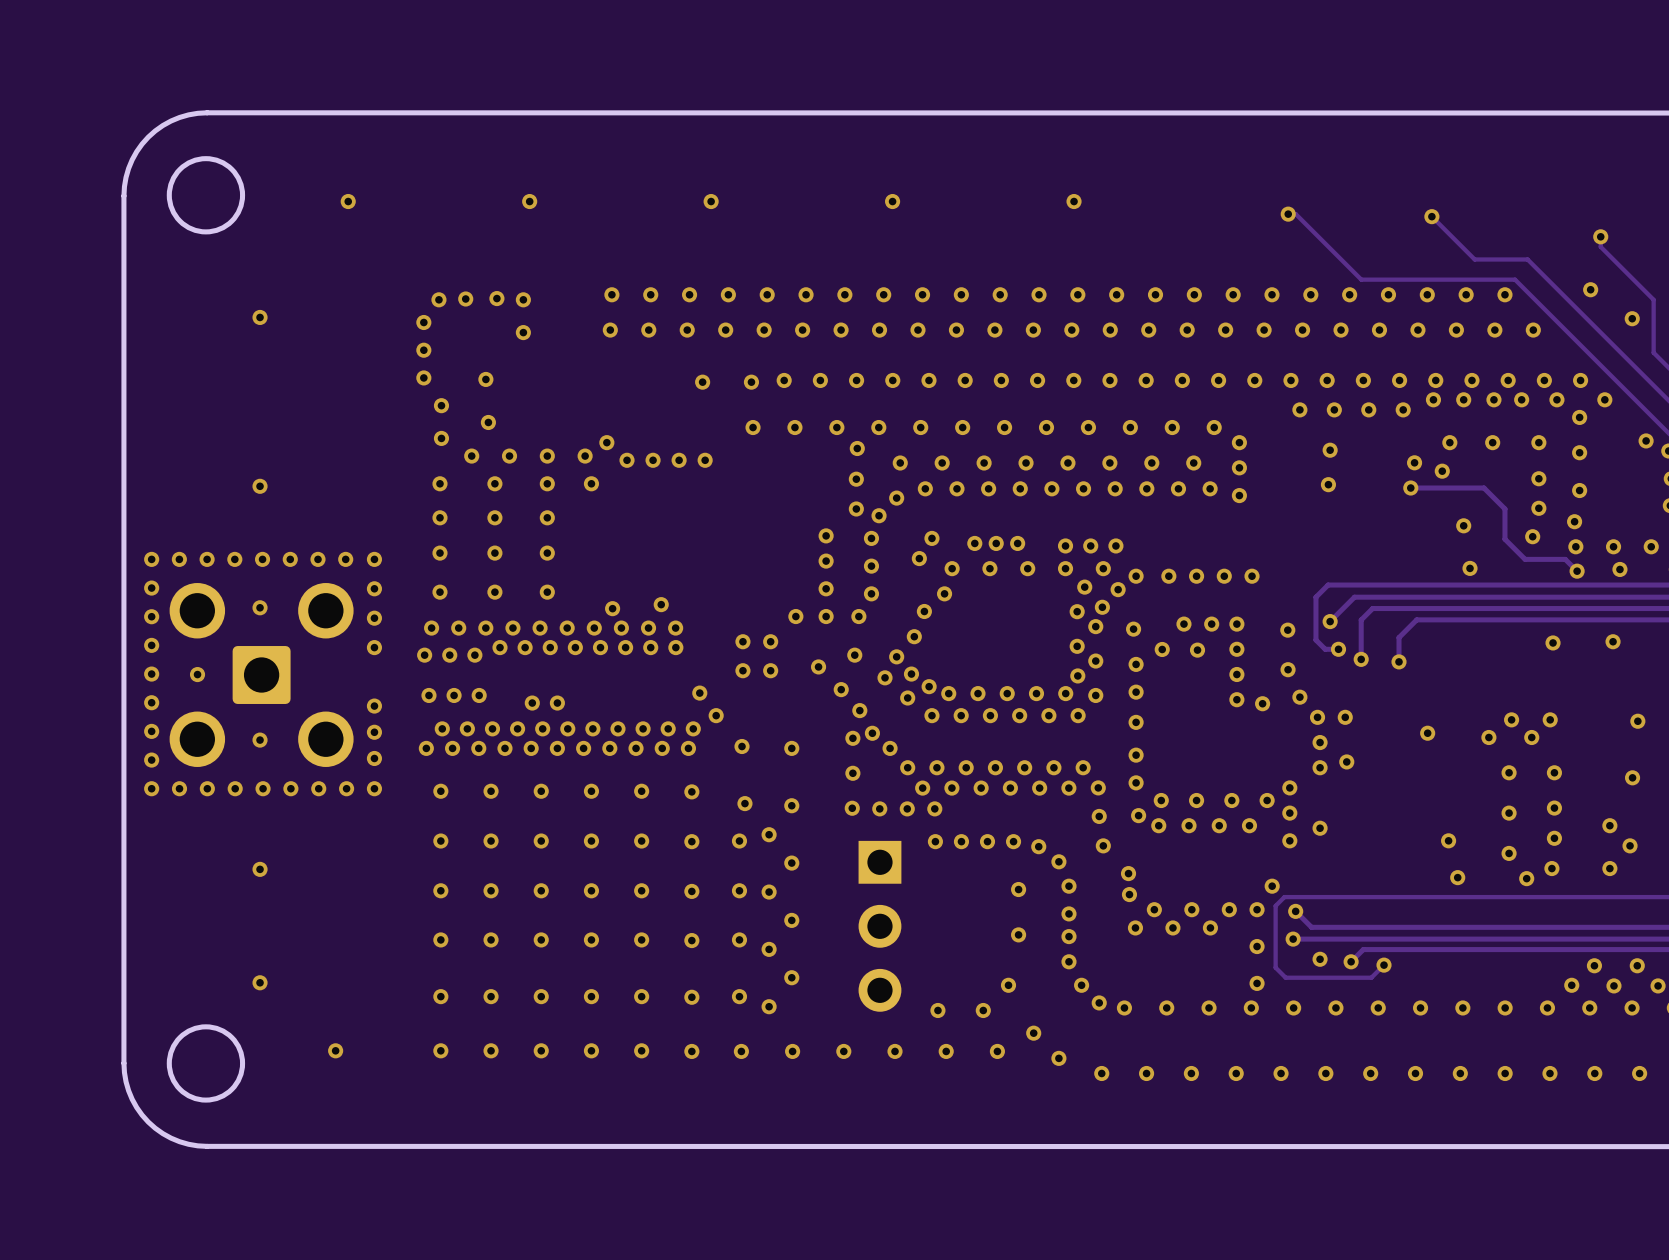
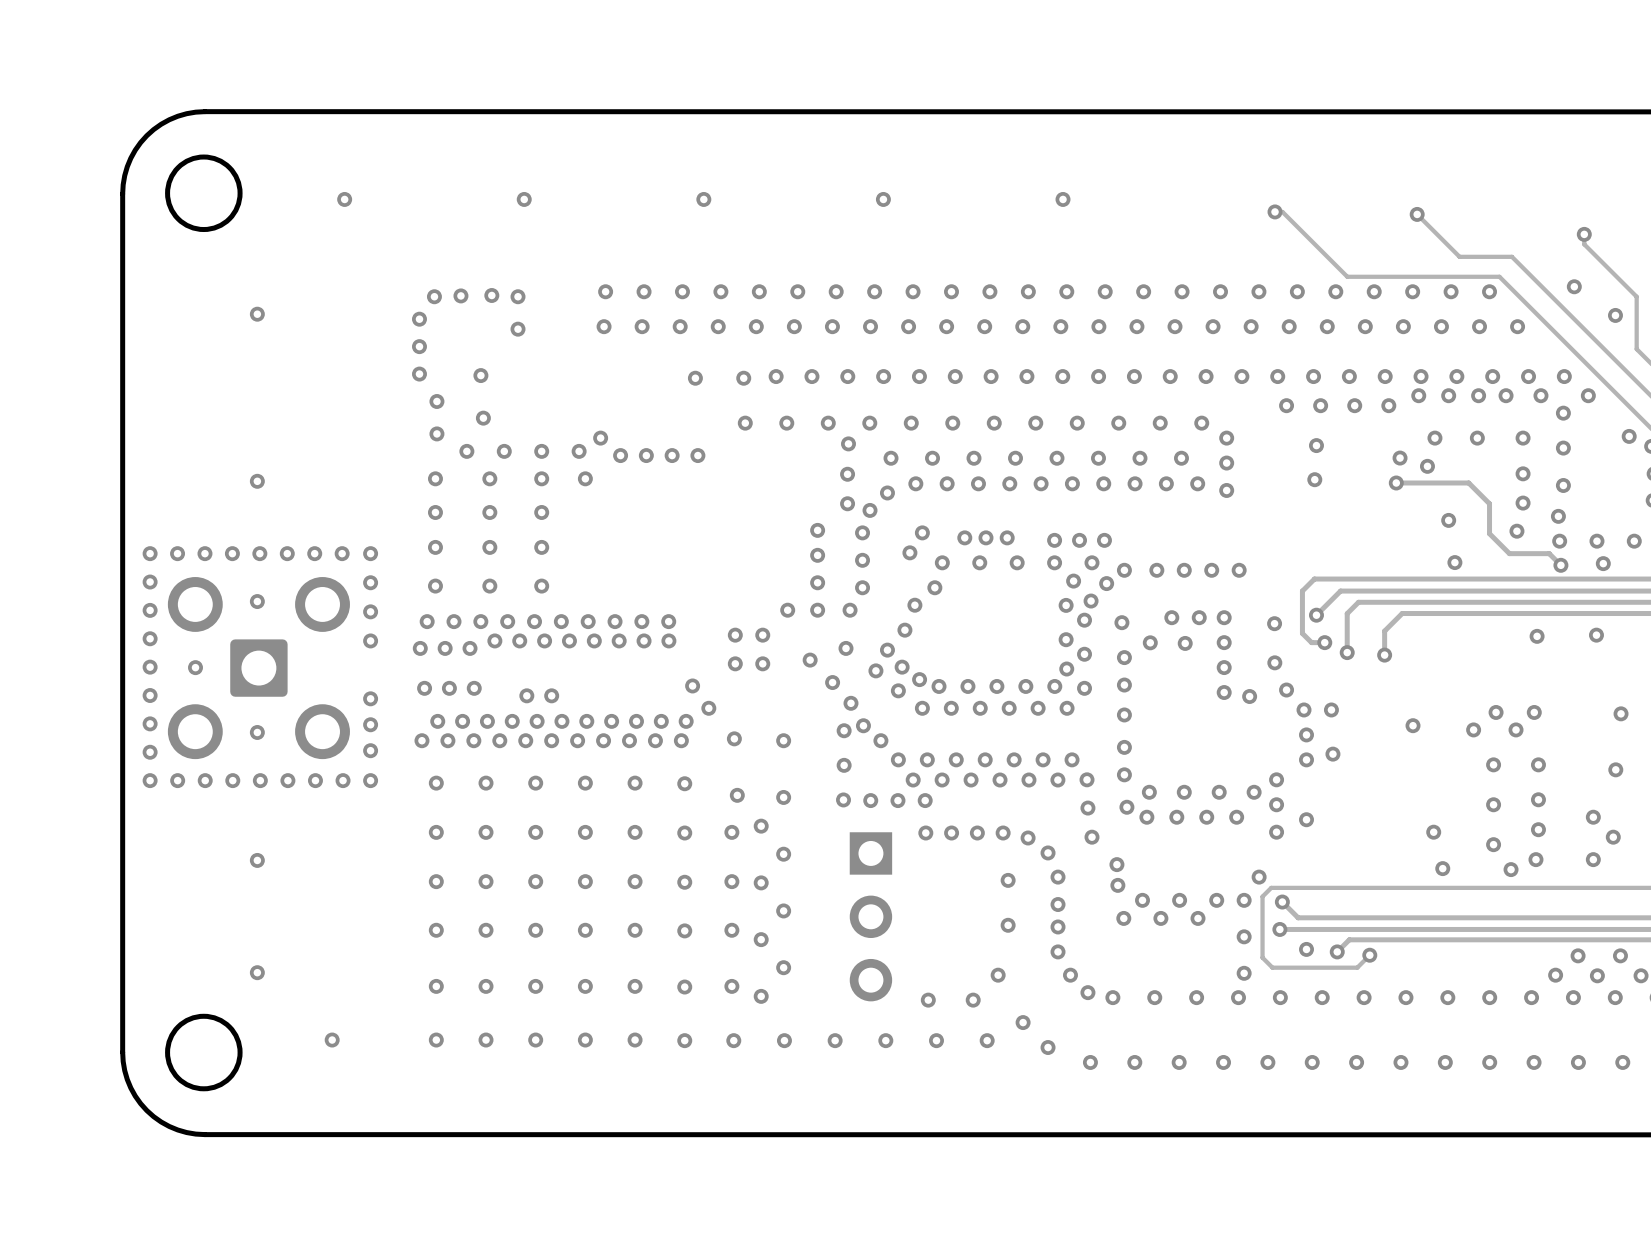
via: (661, 604) -> none
via: (612, 608) -> none

